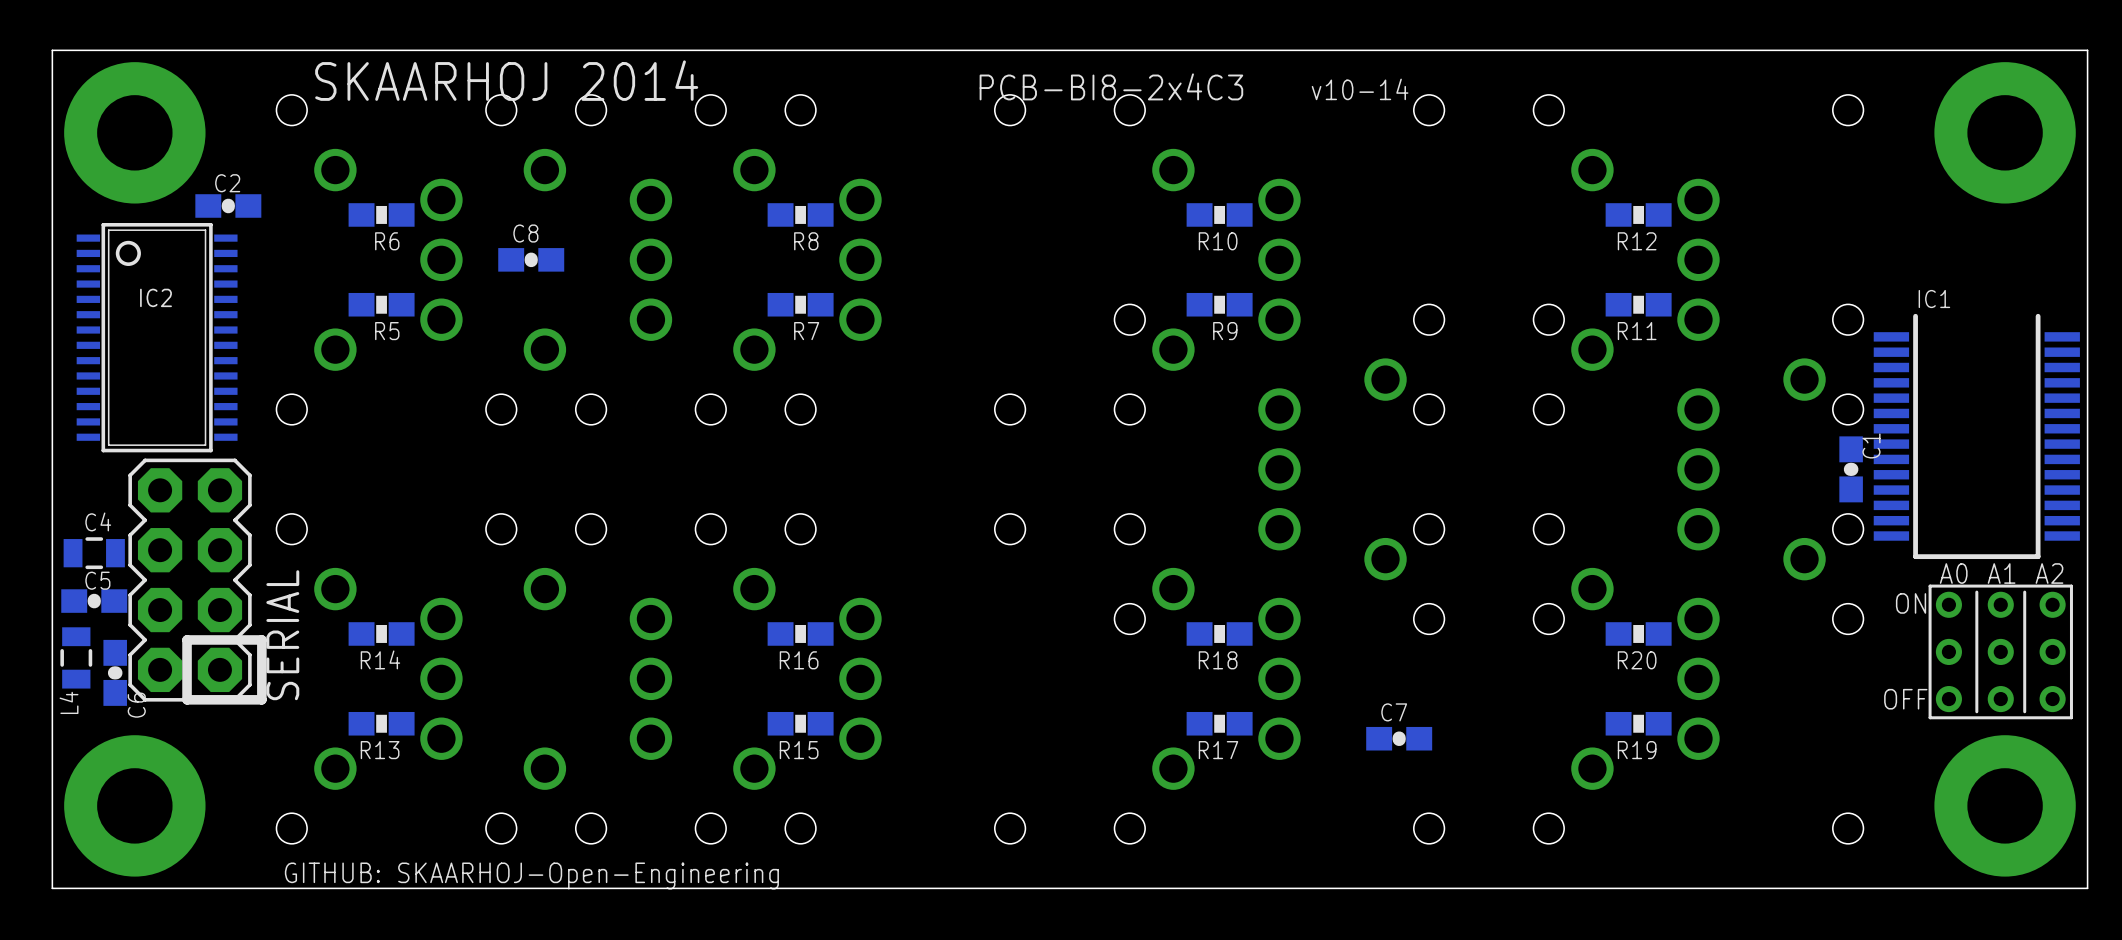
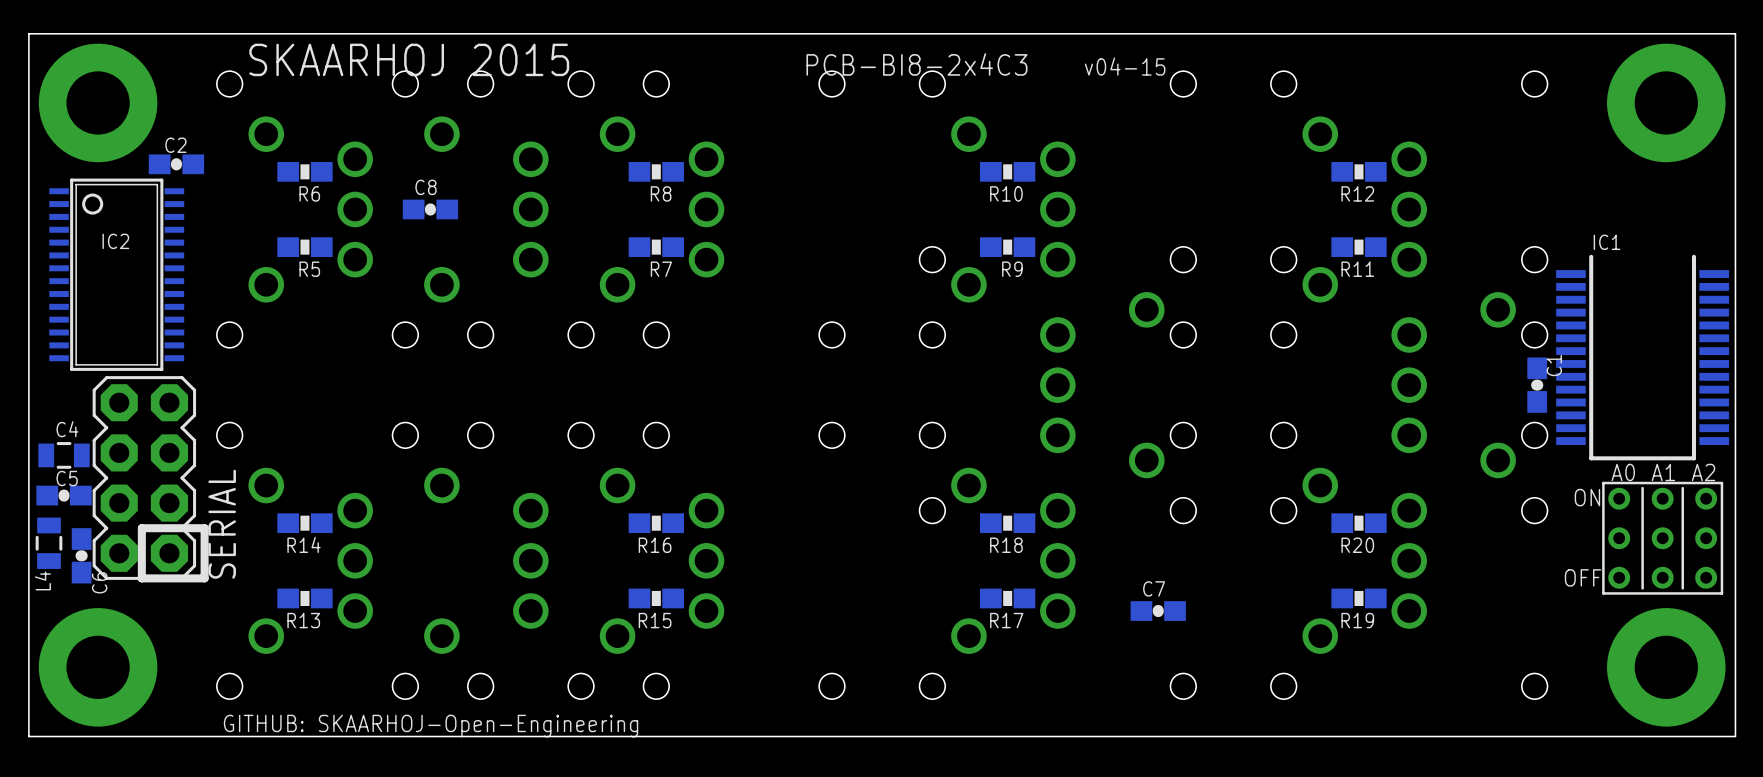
text: SKAARHOJ 2014 (506, 80) -> SKAARHOJ 2015 (409, 59)
text: v10-14 (1360, 89) -> v04-15 (1125, 66)

